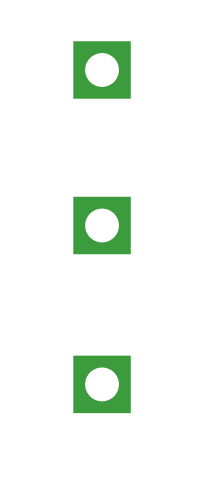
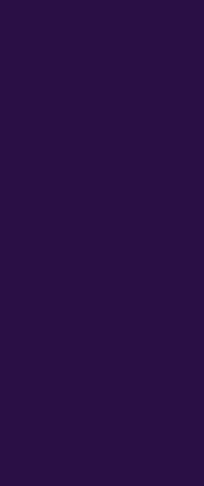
part: (102, 69) -> none
part: (102, 225) -> none
part: (102, 384) -> none

